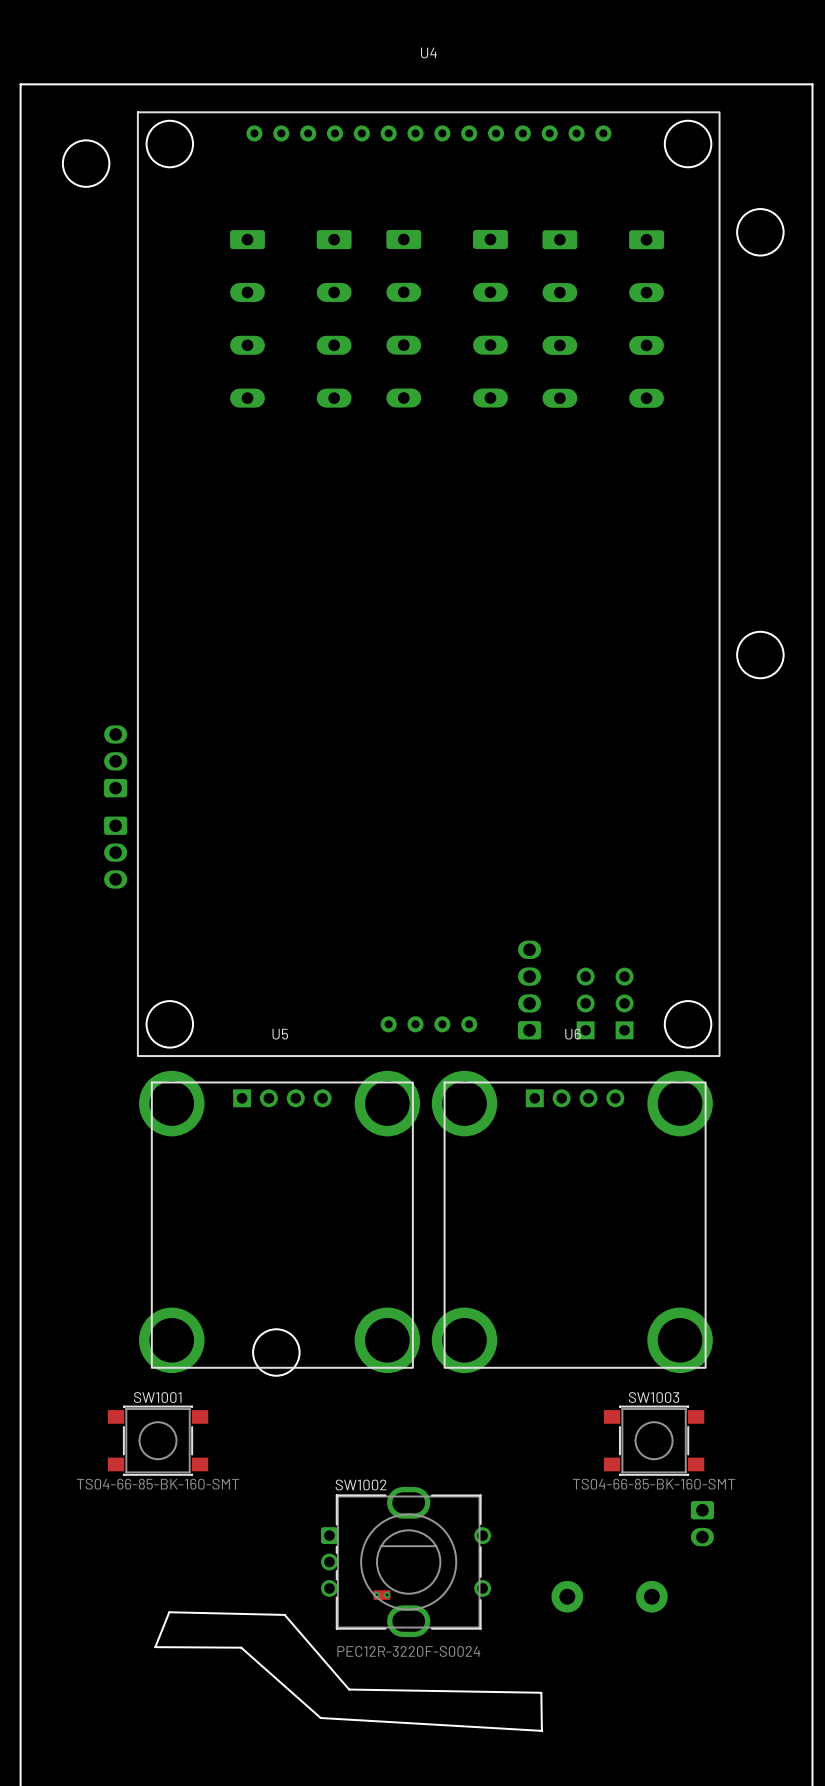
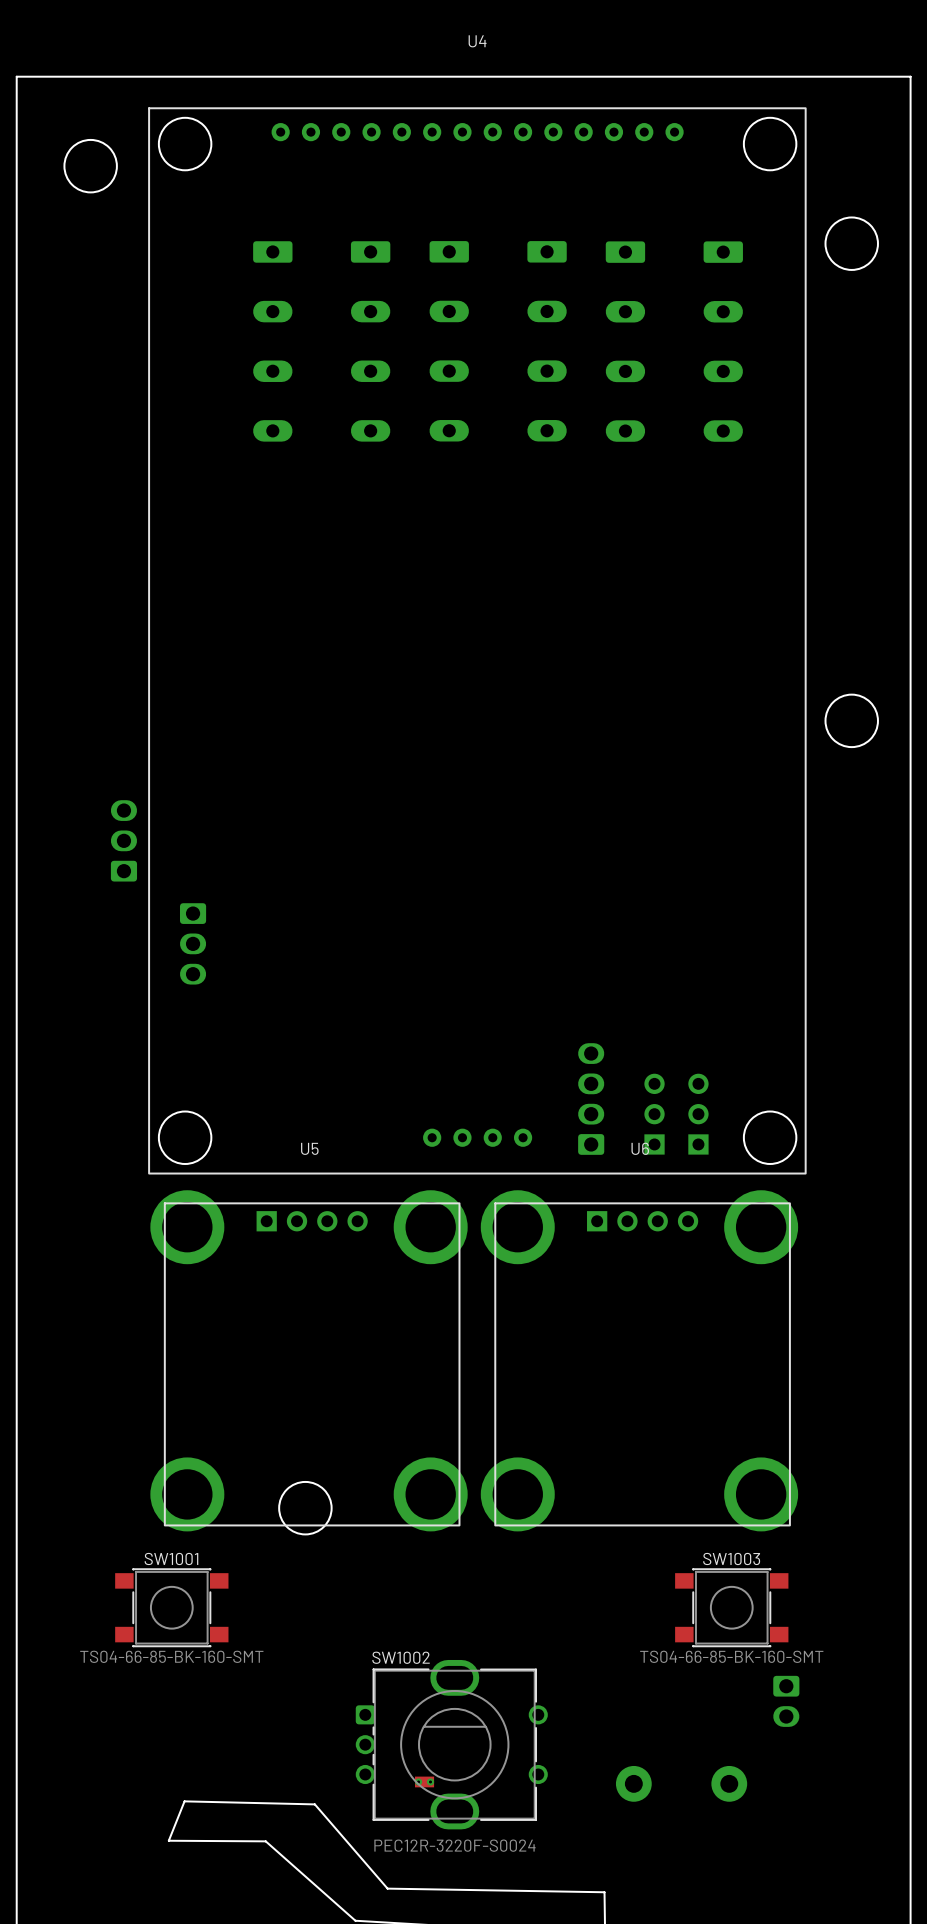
part position: (115, 852) -> (193, 943)

